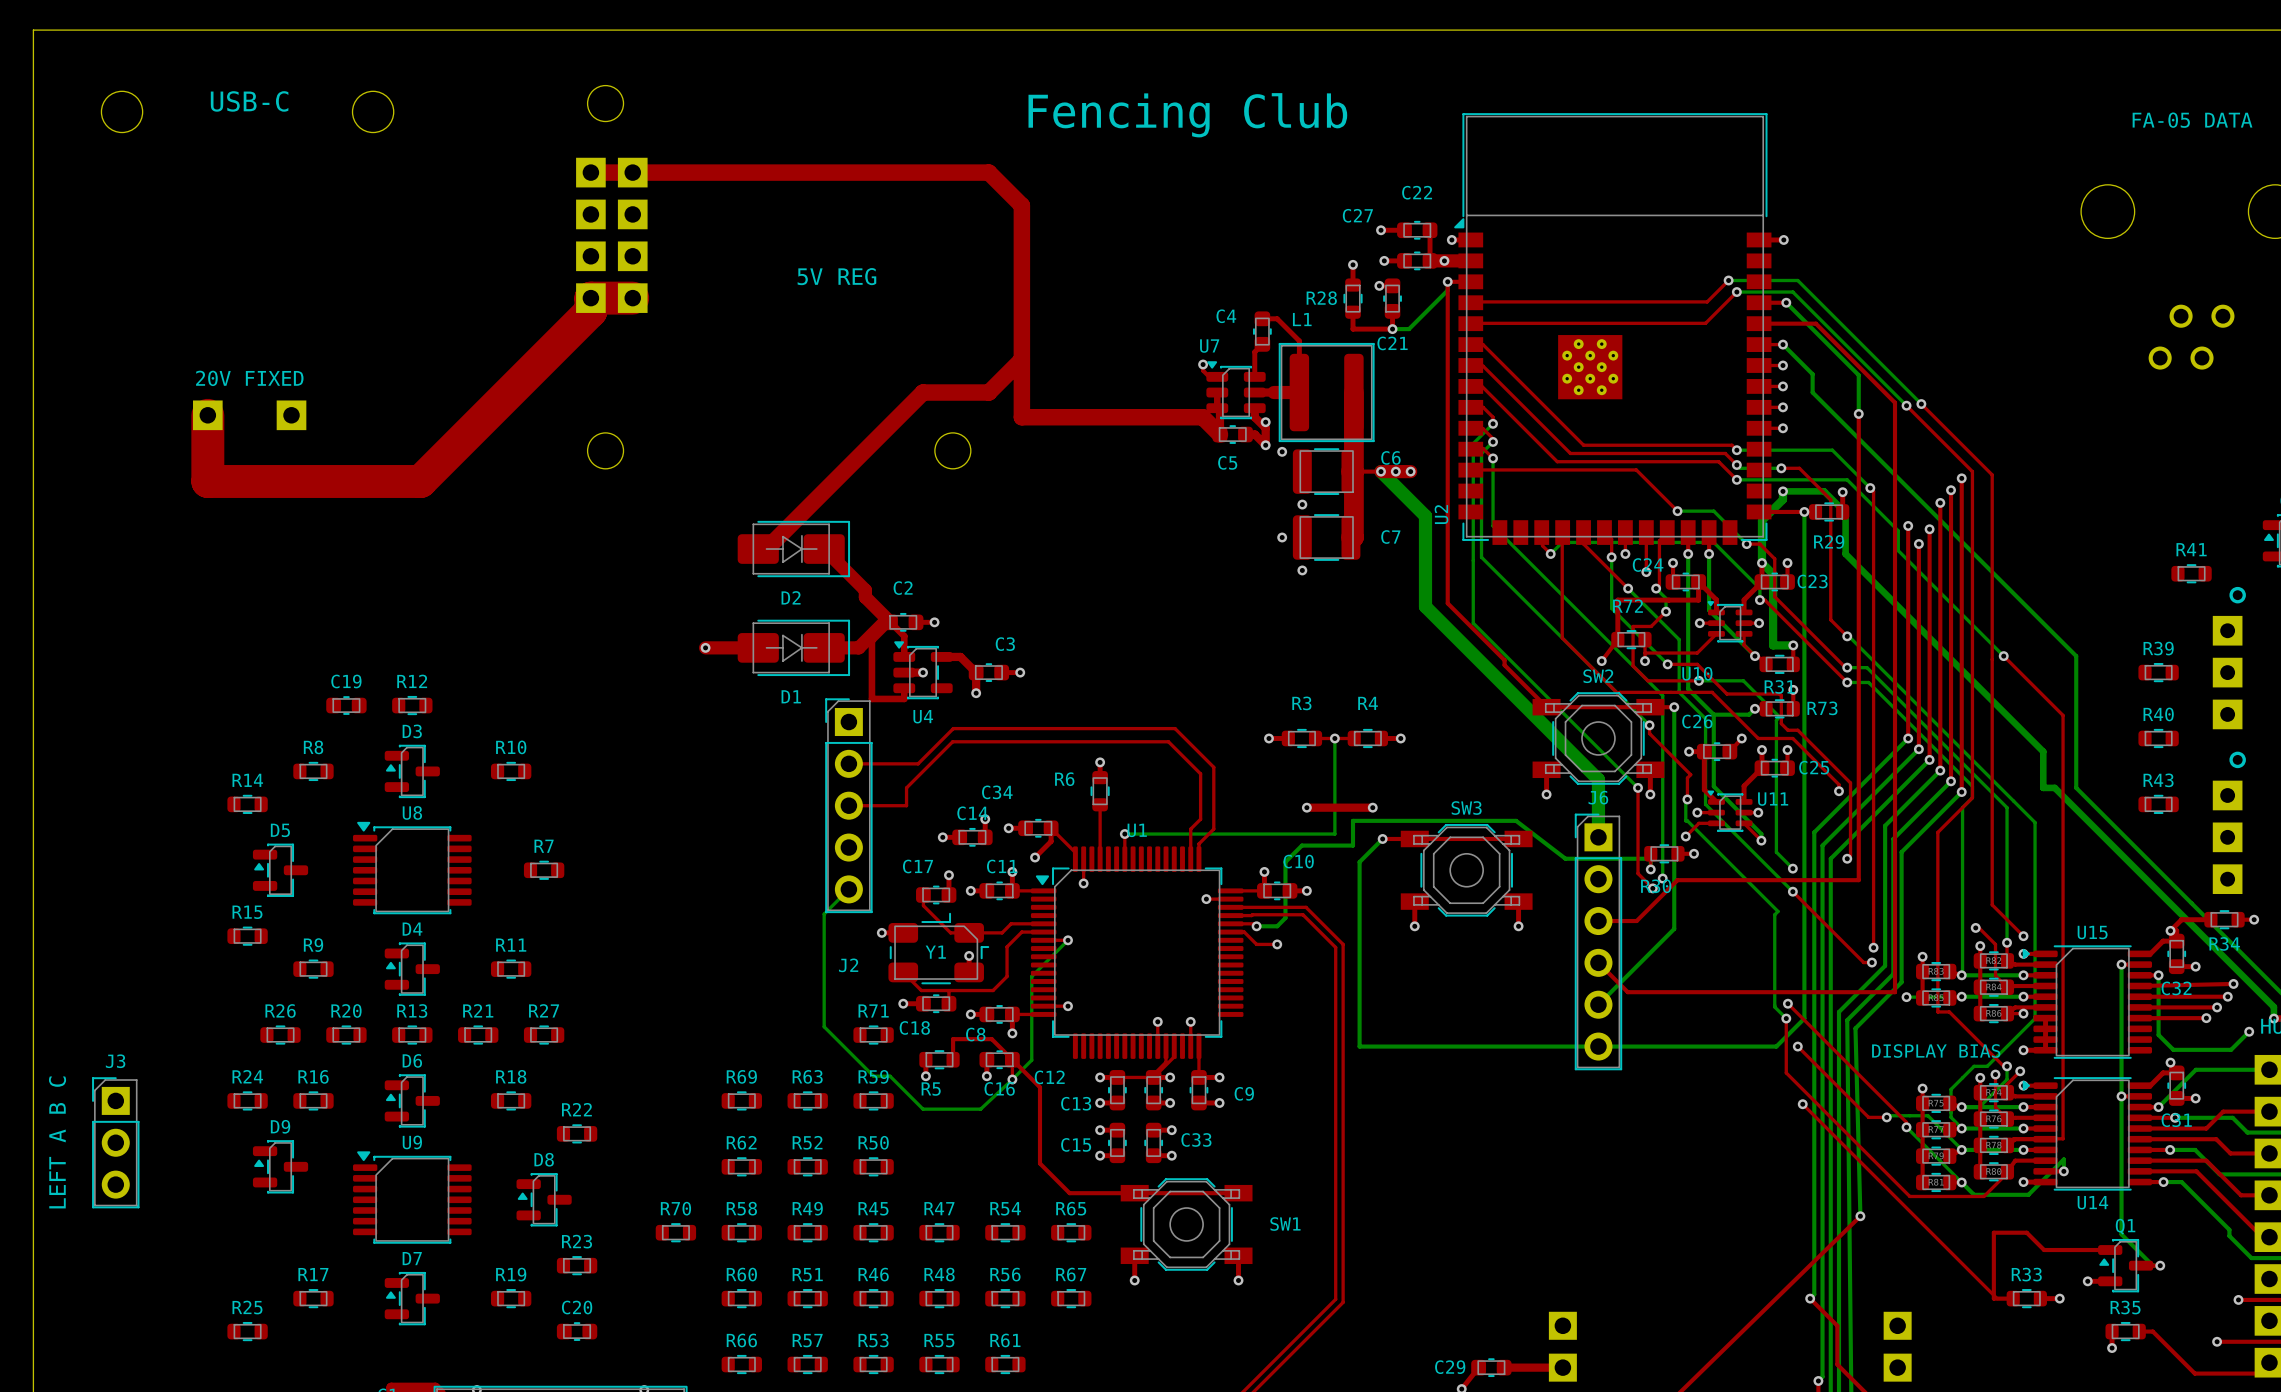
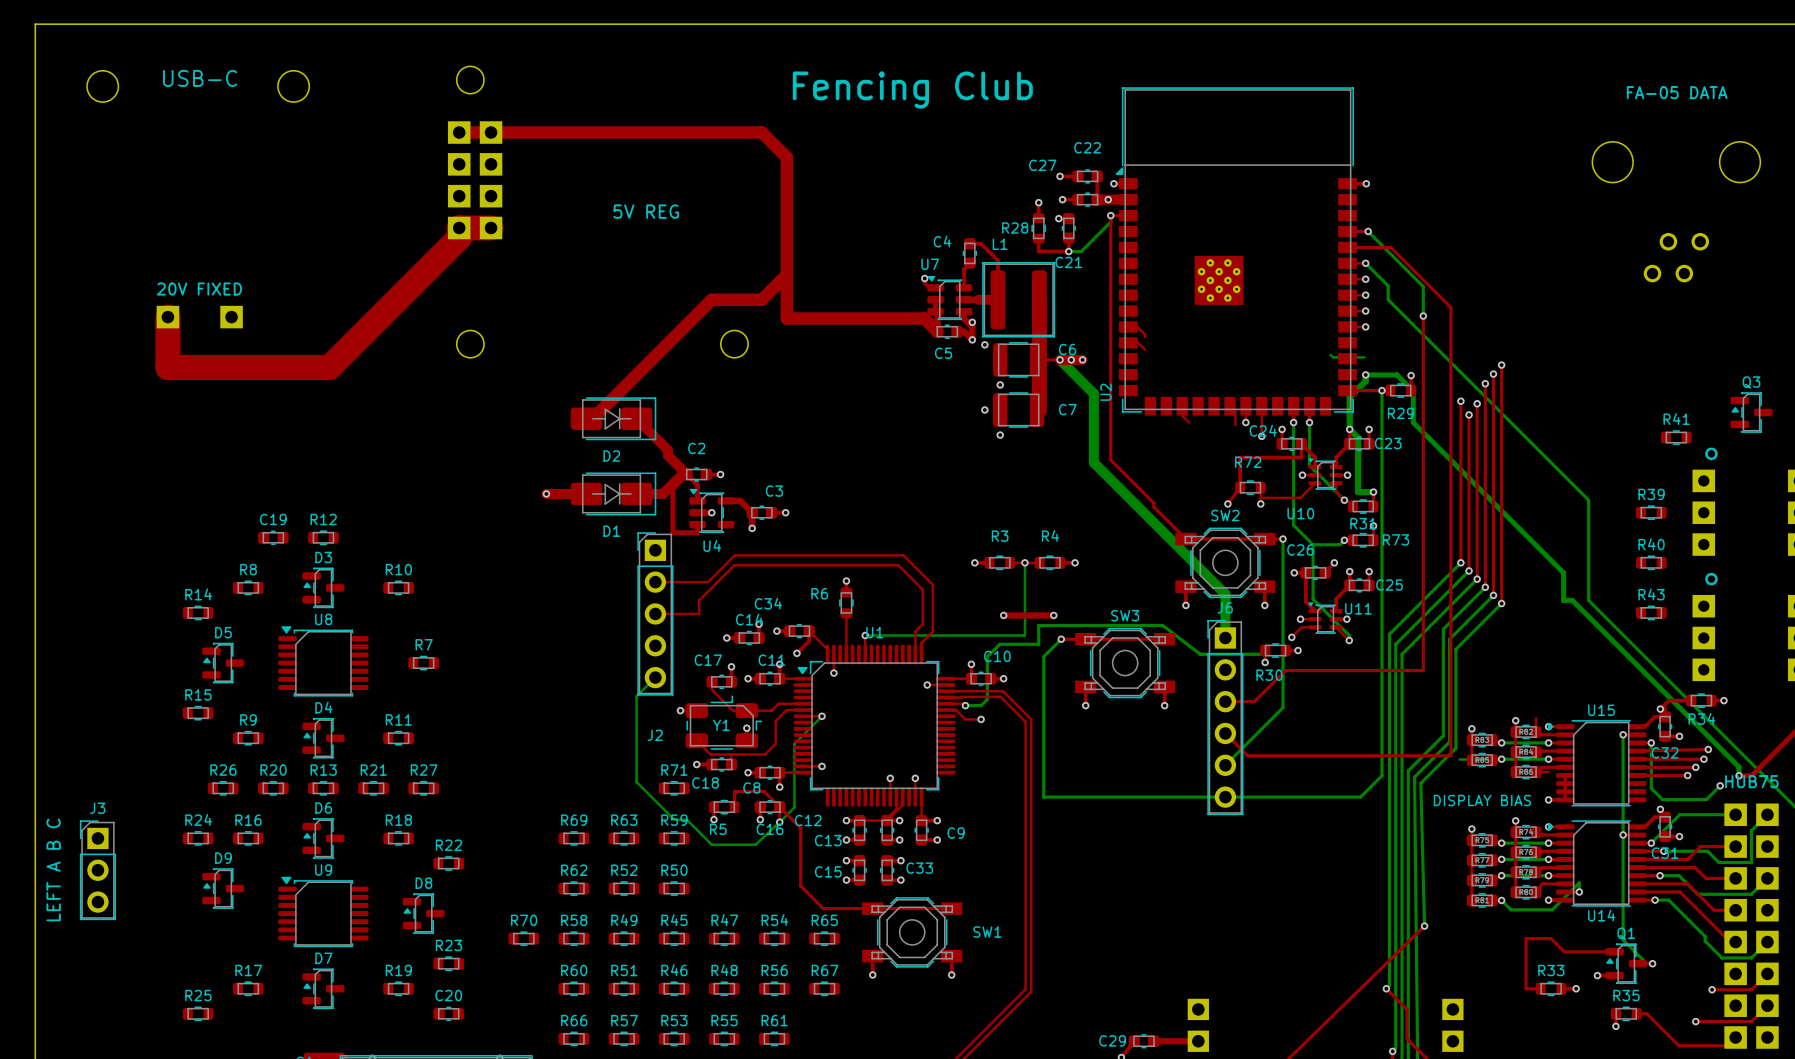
top track: (1728, 280) (1707, 301) (1470, 302) -> none
bottom track: (1728, 280) (1797, 280) (1921, 404) -> none
via: (1728, 280) -> none
top track: (1736, 292) (1705, 323) (1470, 323) -> none
bottom track: (1736, 292) (1792, 292) (1906, 405) -> none
via: (1736, 292) -> none
top track: (1470, 344) (1483, 344) (1583, 445) (1731, 445) (1736, 450) -> none
top track: (1470, 365) (1483, 366) (1570, 453) (1725, 453) (1736, 465) -> none
top track: (1470, 386) (1481, 385) (1557, 461) (1718, 461) (1736, 479) -> none
top track: (1921, 404) (1992, 474) (1992, 904) (2023, 936) -> none
via: (1921, 404) -> none
top track: (1906, 405) (1972, 471) (1972, 797) (1937, 832) (1937, 1011) (1949, 1011) (2003, 1066) (2007, 1066) -> none
via: (1906, 405) -> none
top track: (1469, 407) (1483, 407) (1493, 417) (1493, 423) -> none
bottom track: (1493, 423) (1473, 443) (1473, 623) (1638, 787) -> none
via: (1493, 423) -> none
bottom track: (1493, 441) (1481, 453) (1481, 557) (1649, 725) -> none
via: (1493, 441) -> none
bottom track: (1736, 450) (1832, 450) (1870, 488) -> none
via: (1736, 450) -> none
bottom track: (1493, 458) (1493, 525) (1662, 695) (1662, 878) -> none
via: (1493, 458) -> none
via: (1736, 465) -> none
top track: (1781, 468) (1799, 468) (1830, 499) (1830, 619) (1847, 636) -> none
via: (1781, 468) -> none
top track: (1470, 470) (1636, 469) (1677, 511) -> none
bottom track: (1736, 479) (1847, 479) (1898, 530) (1898, 550) (2003, 656) -> none
via: (1736, 479) -> none
top track: (1870, 488) (1873, 491) (1873, 947) -> none
via: (1870, 488) -> none
bottom track: (1677, 511) (1713, 511) (1746, 544) -> none
via: (1677, 511) -> none
top track: (1562, 532) (1562, 637) (1618, 694) (1619, 692) (1712, 692) (1758, 738) (1792, 738) (1839, 784) (1839, 791) -> none
top track: (1583, 532) (1583, 544) (1628, 588) -> none
top track: (1667, 532) (1659, 540) (1659, 585) (1656, 588) -> none
top track: (1746, 544) (1759, 544) (1774, 558) (1774, 596) (1847, 667) -> none
via: (1746, 544) -> none
bottom track: (1550, 553) (1562, 542) (1713, 542) (1759, 588) (1759, 600) -> none
via: (1550, 553) -> none
bottom track: (1611, 557) (1611, 608) (1667, 664) -> none
via: (1611, 557) -> none
bottom track: (1628, 588) (1679, 639) (1679, 692) (1705, 718) (1705, 804) (1792, 891) -> none
via: (1628, 588) -> none
bottom track: (1656, 588) (1666, 598) (1666, 611) -> none
via: (1656, 588) -> none
top track: (1759, 600) (1764, 600) (1847, 682) -> none
via: (1759, 600) -> none
top track: (1666, 611) (1651, 626) (1633, 626) (1633, 666) (1647, 680) (1698, 680) -> none
via: (1666, 611) -> none
bottom track: (1847, 636) (2035, 822) (2035, 1018) (1987, 1066) (1974, 1066) (1951, 1089) (1951, 1117) (1961, 1128) -> none
via: (1847, 636) -> none
top track: (2003, 656) (2063, 715) (2063, 1138) (2013, 1138) (2007, 1145) -> none
via: (2003, 656) -> none
top track: (1667, 664) (1697, 664) (1726, 694) (1779, 694) (1781, 695) (1781, 723) (1787, 730) (1797, 730) (1850, 782) (1850, 855) (1847, 858) -> none
via: (1667, 664) -> none
bottom track: (1847, 667) (1867, 667) (2007, 807) (2007, 942) -> none
via: (1847, 667) -> none
bottom track: (1698, 680) (1743, 680) (1779, 717) (1776, 720) (1776, 852) (1792, 868) -> none
via: (1698, 680) -> none
bottom track: (1847, 682) (1868, 682) (1972, 786) (1972, 797) (1962, 807) (1961, 975) -> none
via: (1847, 682) -> none
top track: (1649, 725) (1649, 733) (1690, 774) (1687, 778) (1687, 799) -> none
via: (1649, 725) -> none
top track: (1638, 787) (1638, 873) (1652, 888) -> none
via: (1638, 787) -> none
via: (1839, 791) -> none
bottom track: (1687, 799) (1685, 801) (1685, 820) (1778, 911) (1774, 914) (1774, 1007) (1786, 1018) -> none
via: (1687, 799) -> none
via: (1847, 858) -> none
via: (1792, 868) -> none
via: (1662, 878) -> none
via: (1652, 888) -> none
top track: (1792, 891) (1863, 962) (1871, 962) -> none
via: (1792, 891) -> none
top track: (1975, 927) (1979, 927) (1995, 944) (1995, 975) (2007, 987) -> none
via: (1975, 927) -> none
via: (2023, 936) -> none
via: (2007, 942) -> none
via: (1873, 947) -> none
via: (1871, 962) -> none
via: (1906, 997) -> none
top track: (1787, 1003) (1906, 1122) (1906, 1127) -> none
via: (1787, 1003) -> none
via: (2023, 1013) -> none
top track: (1786, 1018) (1786, 1072) (1909, 1196) (1983, 1196) (2007, 1171) -> none
via: (1786, 1018) -> none
top track: (1797, 1046) (1868, 1117) (1886, 1117) -> none
via: (1797, 1046) -> none
bottom track: (2007, 1066) (2007, 1079) (1979, 1107) (1961, 1107) -> none
via: (2007, 1066) -> none
top track: (2020, 1071) (2007, 1084) (2007, 1092) -> none
via: (2020, 1071) -> none
top track: (1995, 1074) (1995, 1107) (2007, 1119) -> none
via: (1995, 1074) -> none
top track: (1802, 1104) (1997, 1298) (2013, 1298) -> none
via: (1802, 1104) -> none
bottom track: (1886, 1117) (1888, 1115) (1927, 1115) (1961, 1149) -> none
via: (1886, 1117) -> none
bottom track: (1906, 1127) (1962, 1183) -> none
via: (1906, 1127) -> none

